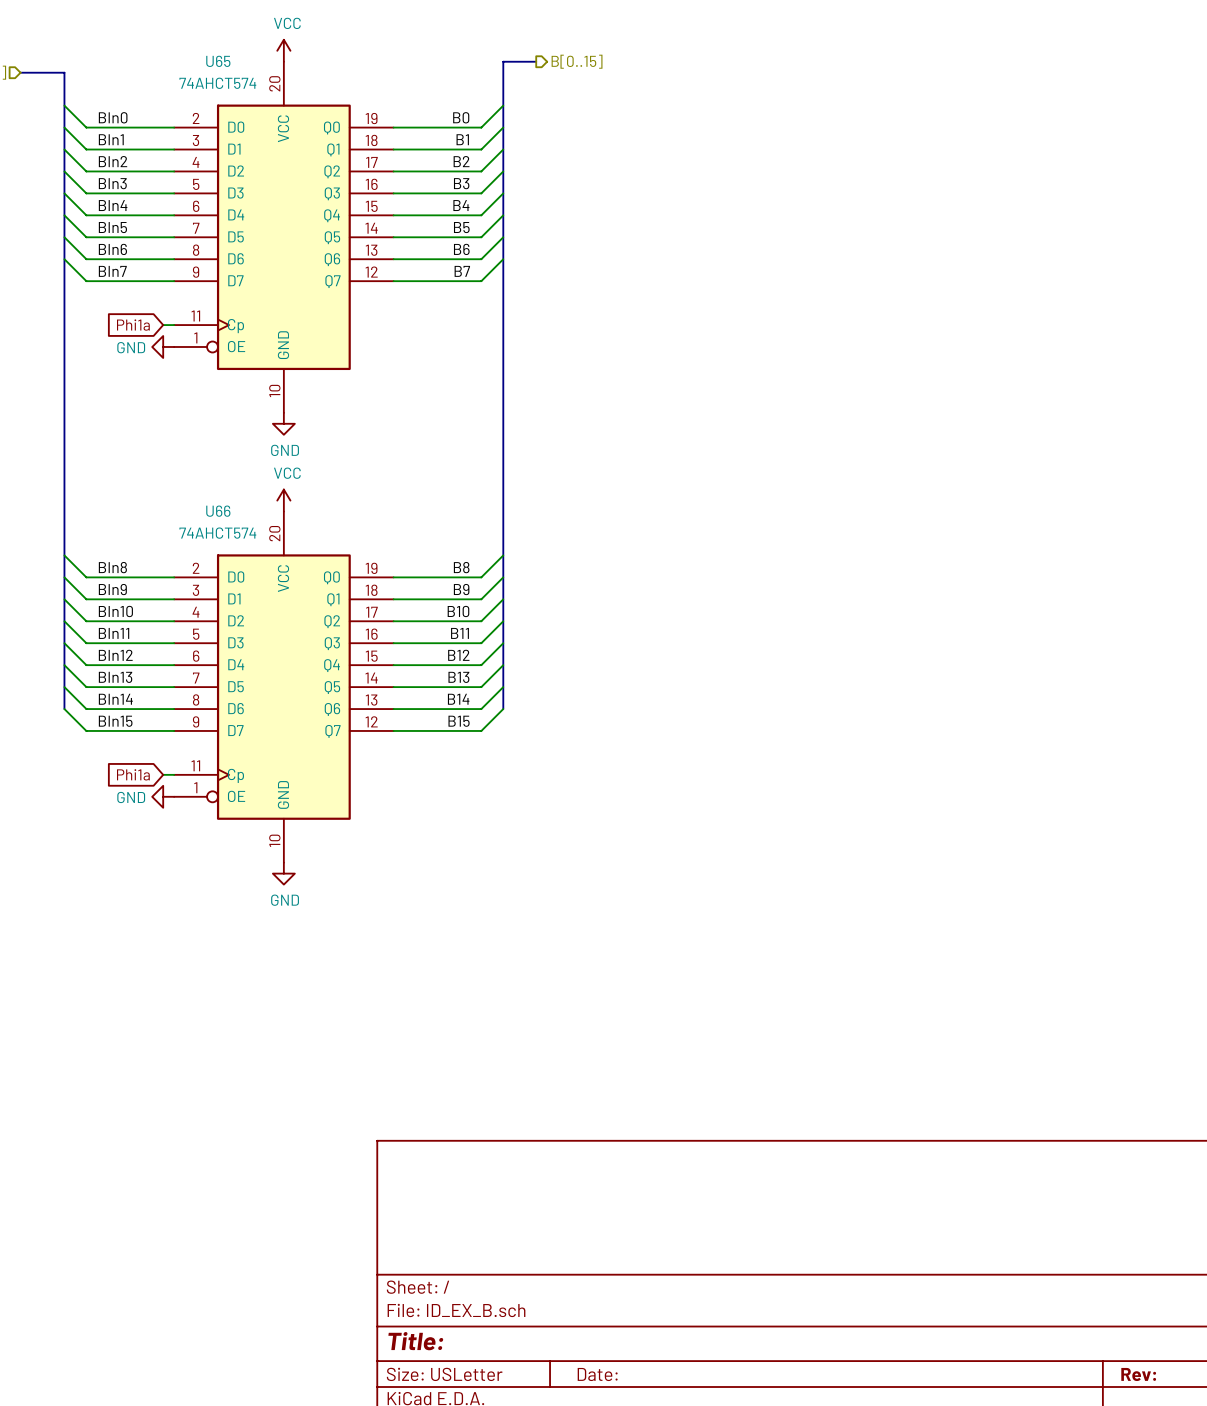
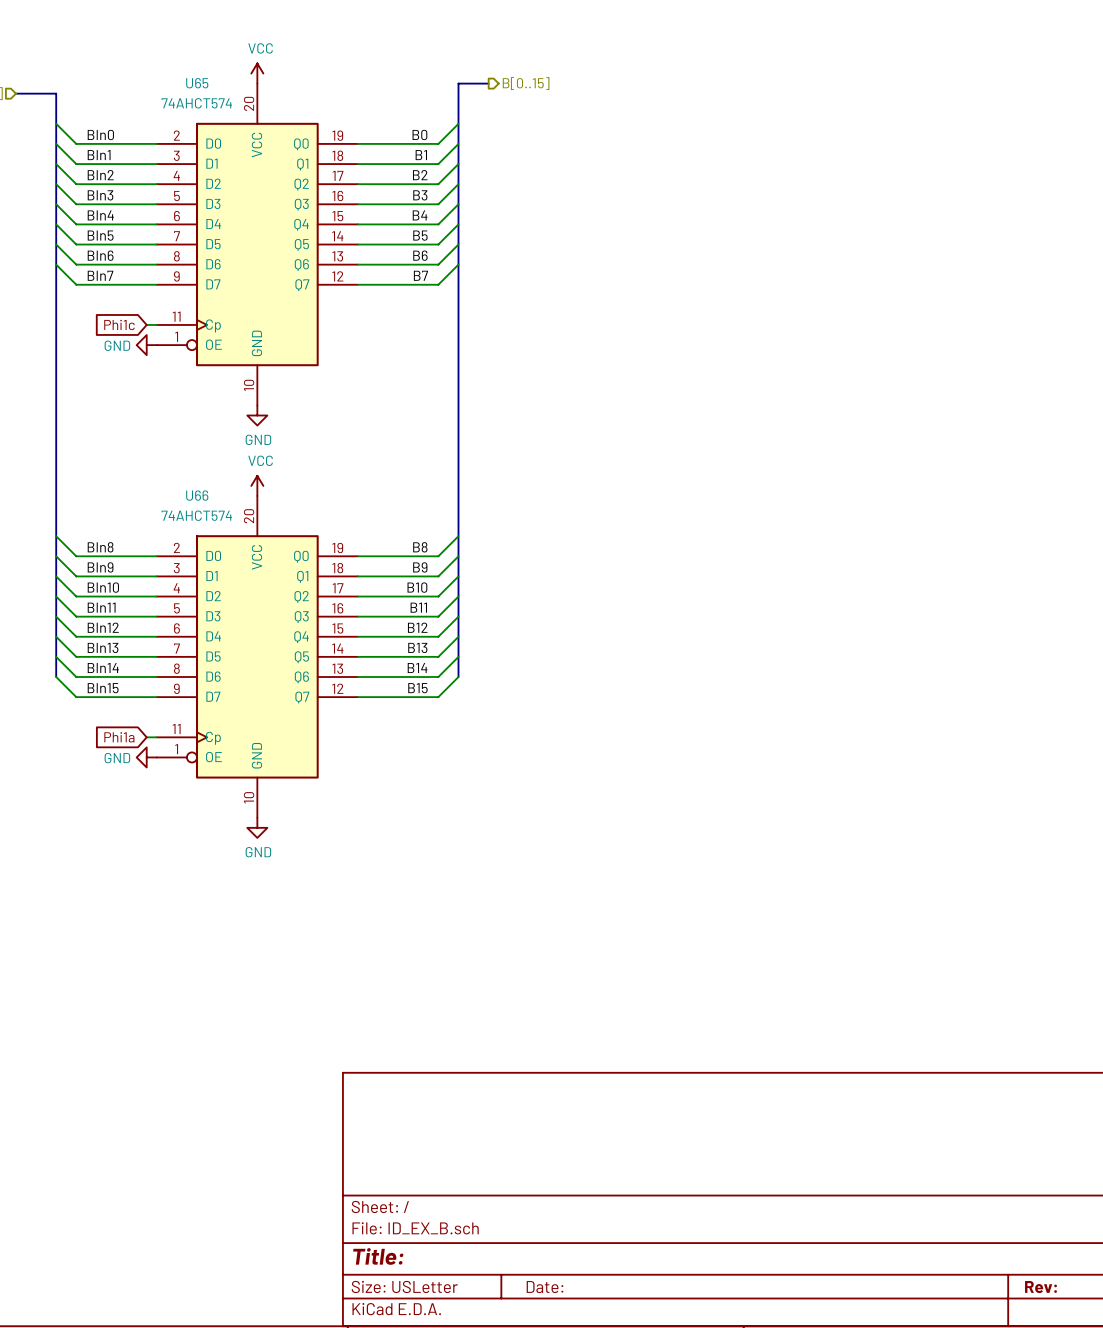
global label: Phi1a (133, 325) -> Phi1c (119, 324)

